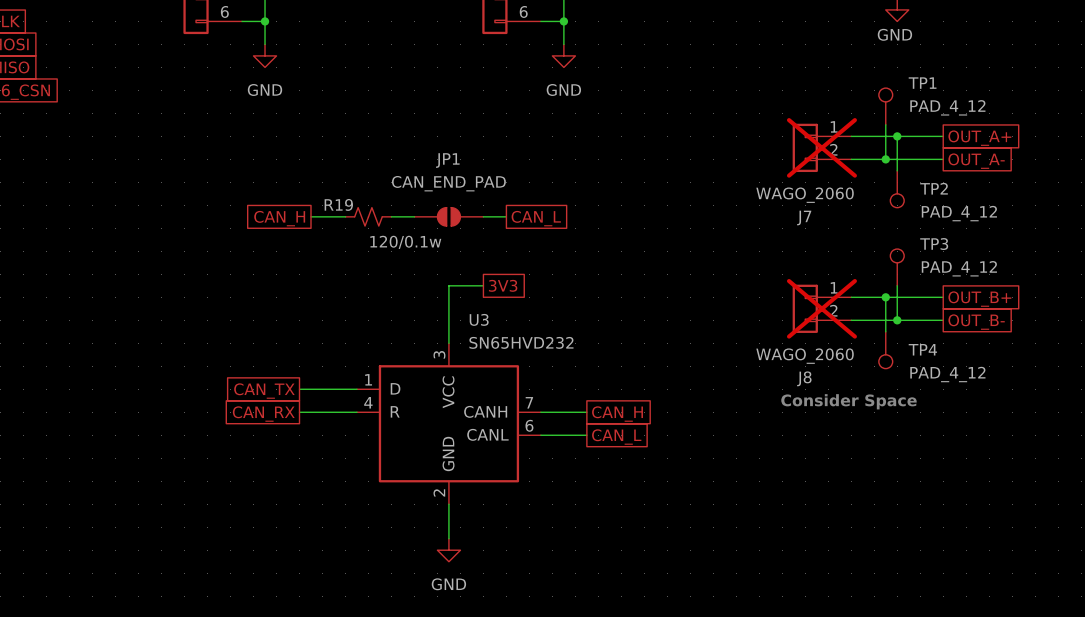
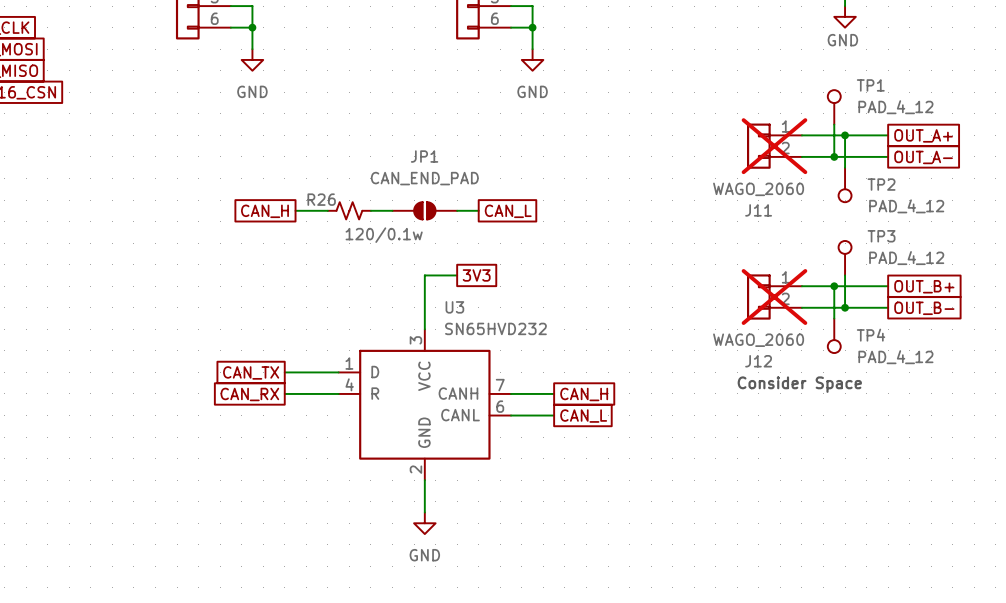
R19 name: R19 (338, 204) -> R26 (321, 199)
J7 name: J7 (804, 218) -> J11 (758, 210)
J8 name: J8 (804, 378) -> J12 (758, 361)

